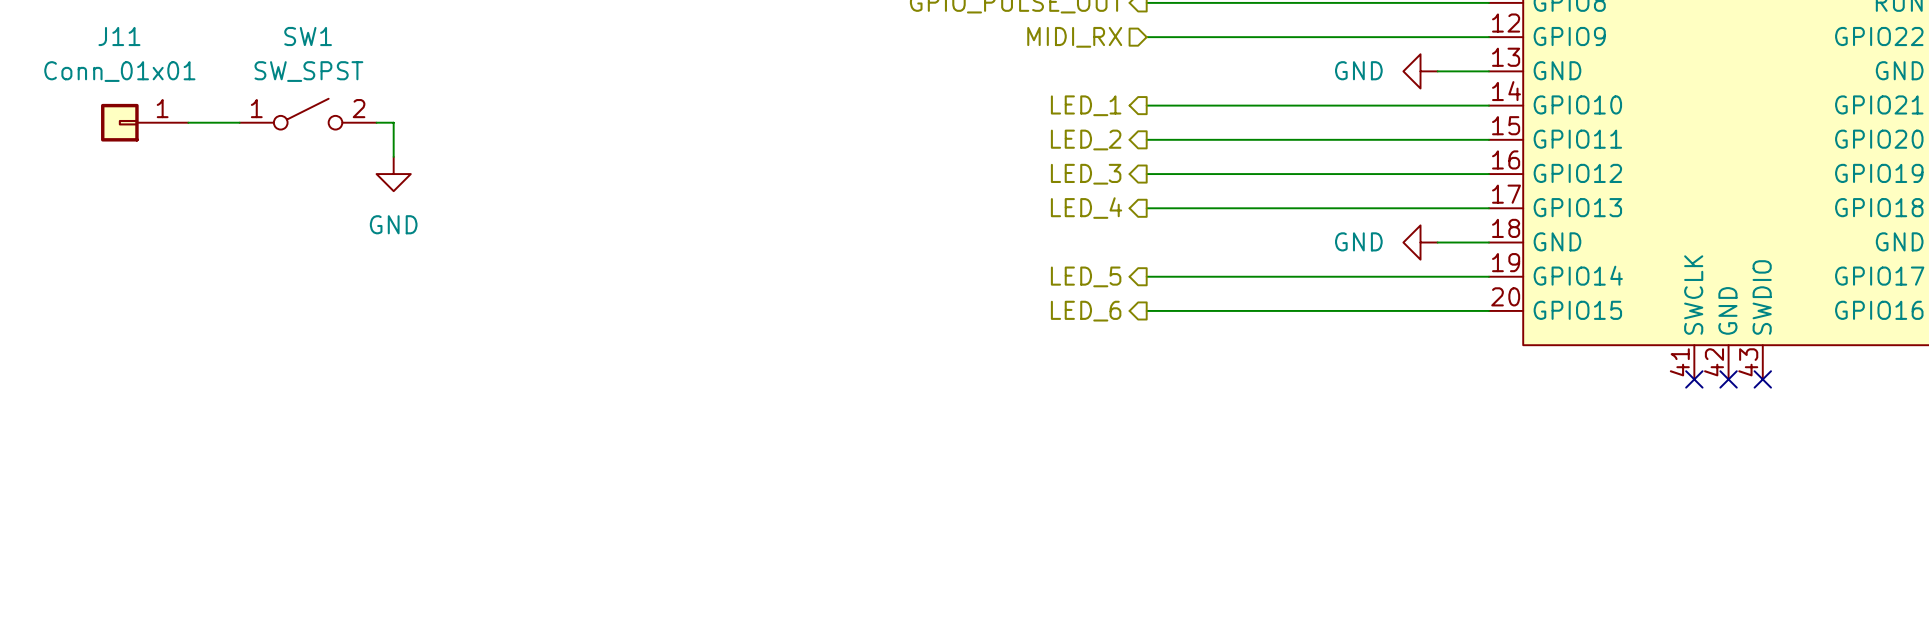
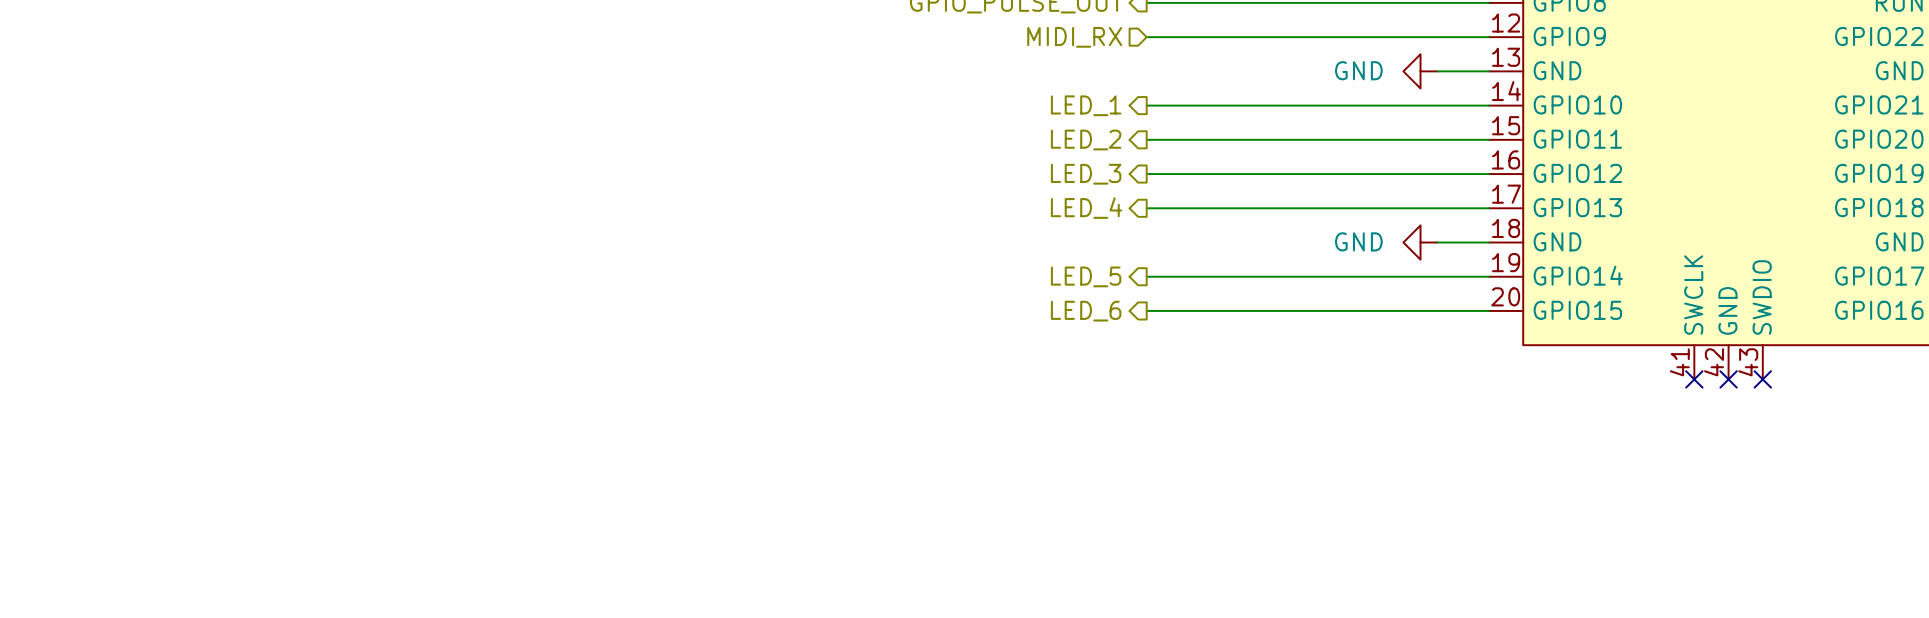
SW1: SW_SPST (308, 114) -> none
J11: Conn_01x01 (144, 122) -> none
wire: (188, 122) (239, 122) -> none
wire: (376, 122) (393, 122) (393, 156) -> none
power symbol: GND (393, 174) -> none

